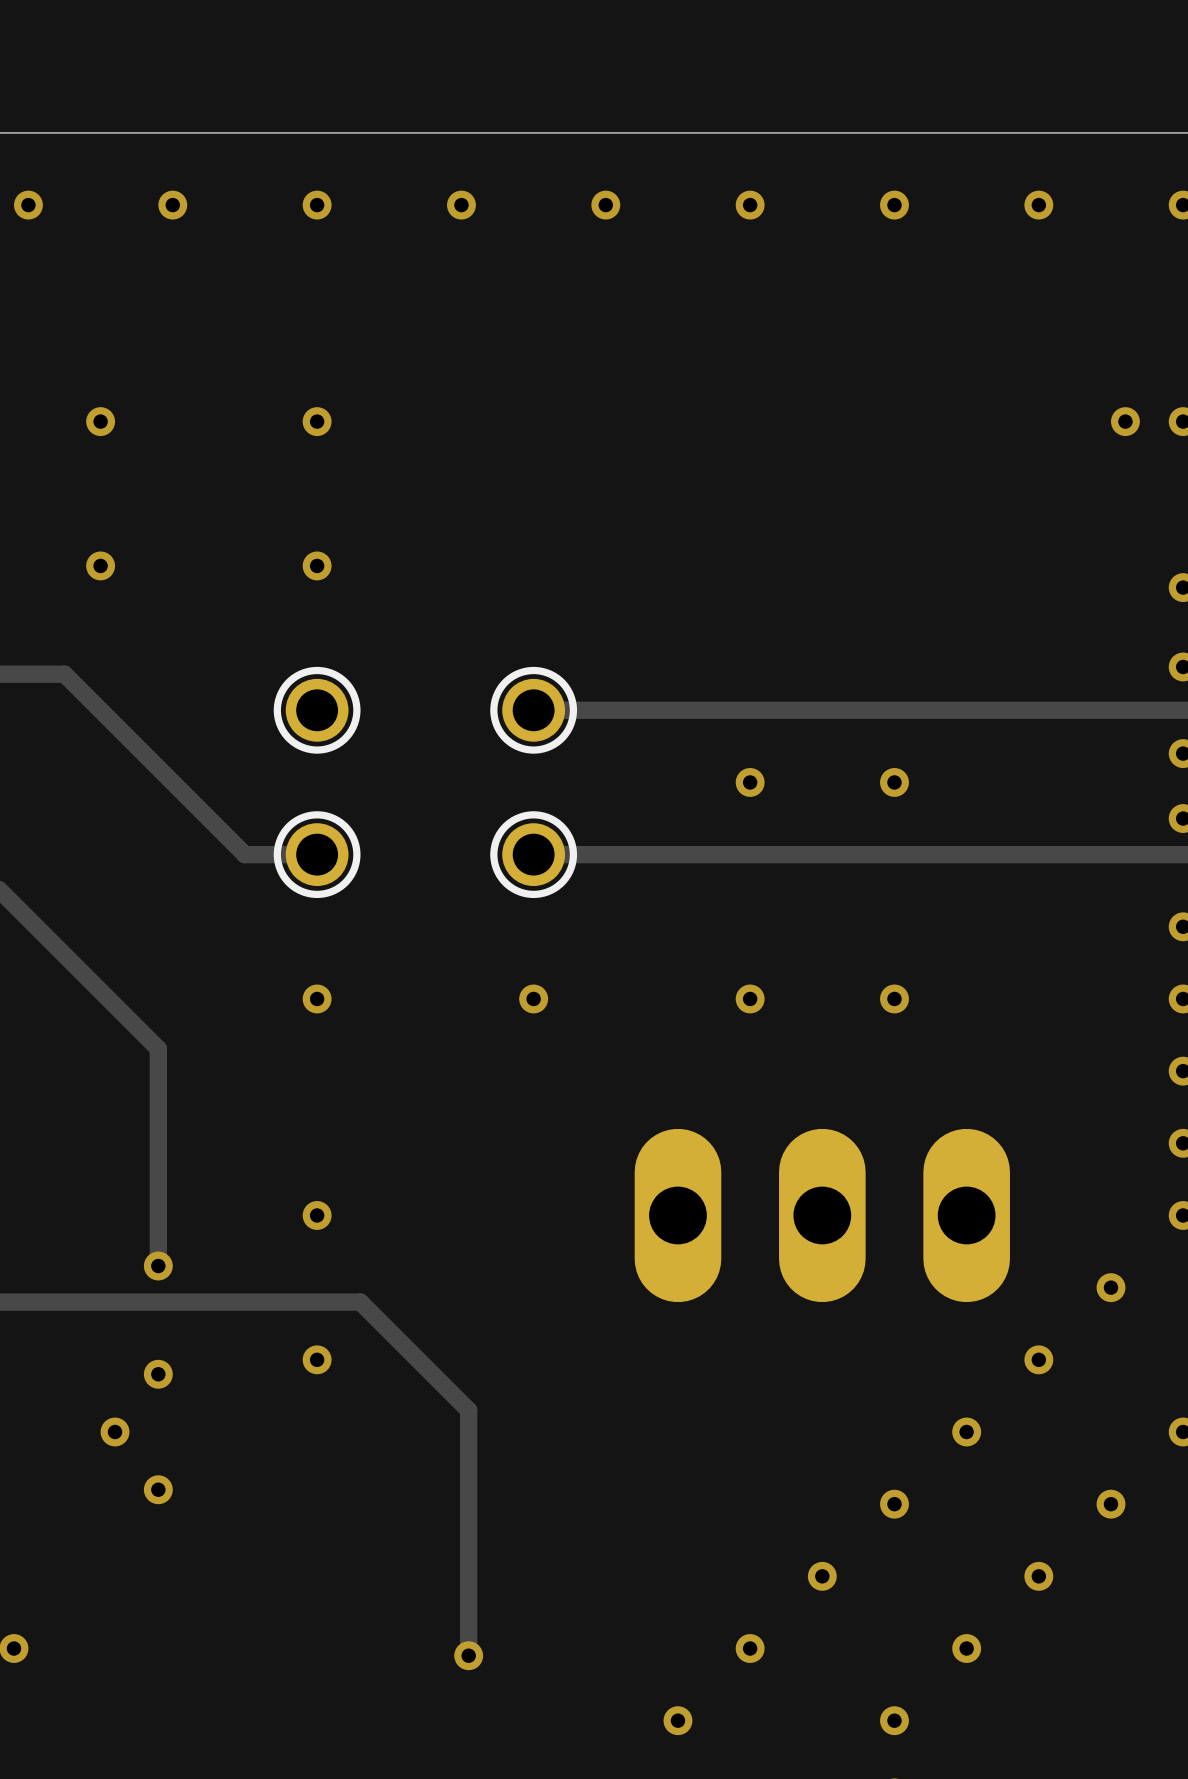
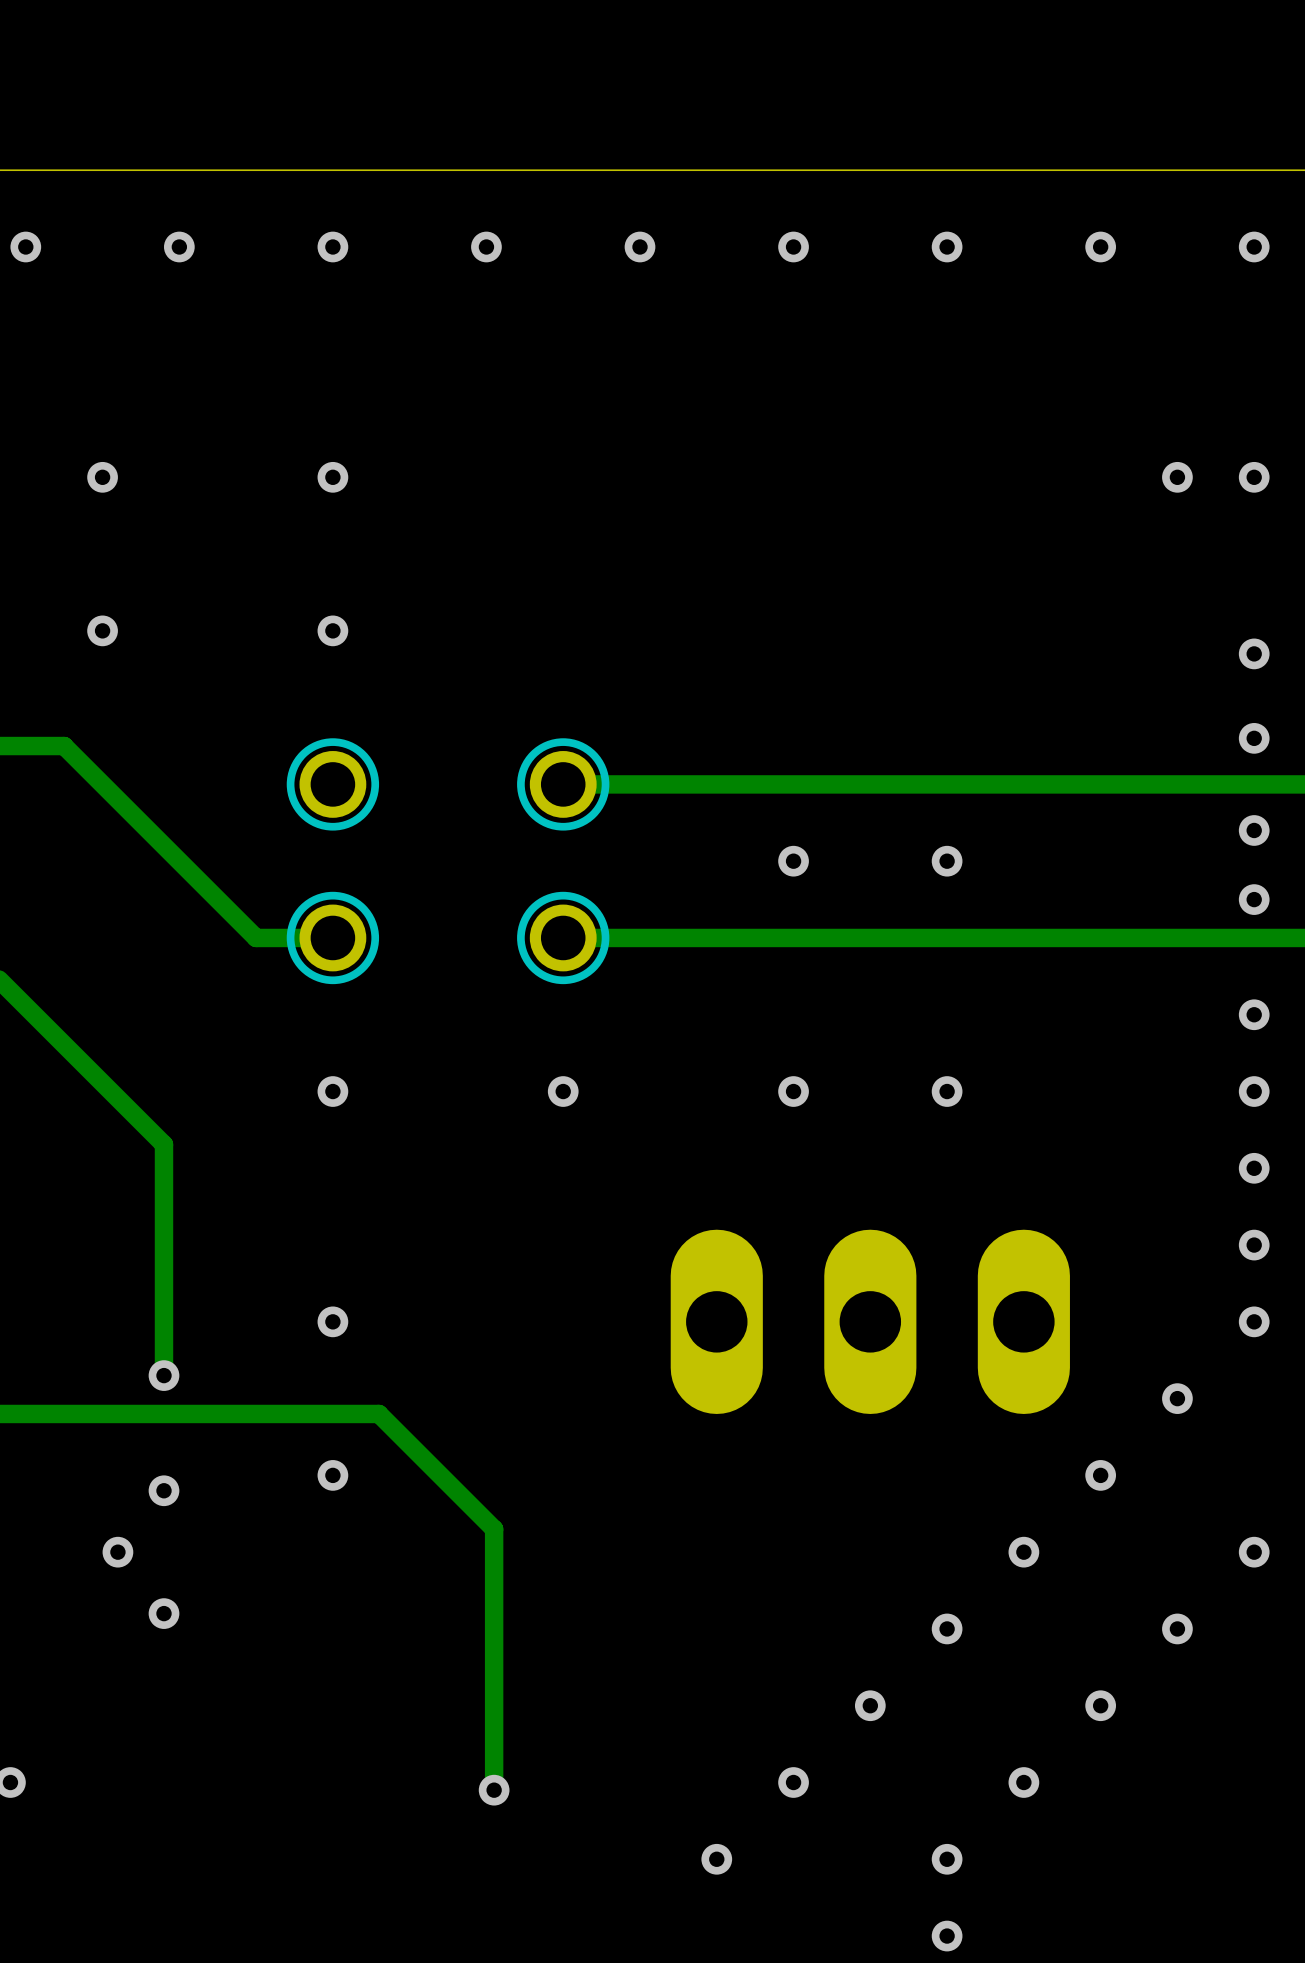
via position: (1125, 421) -> (1177, 477)

